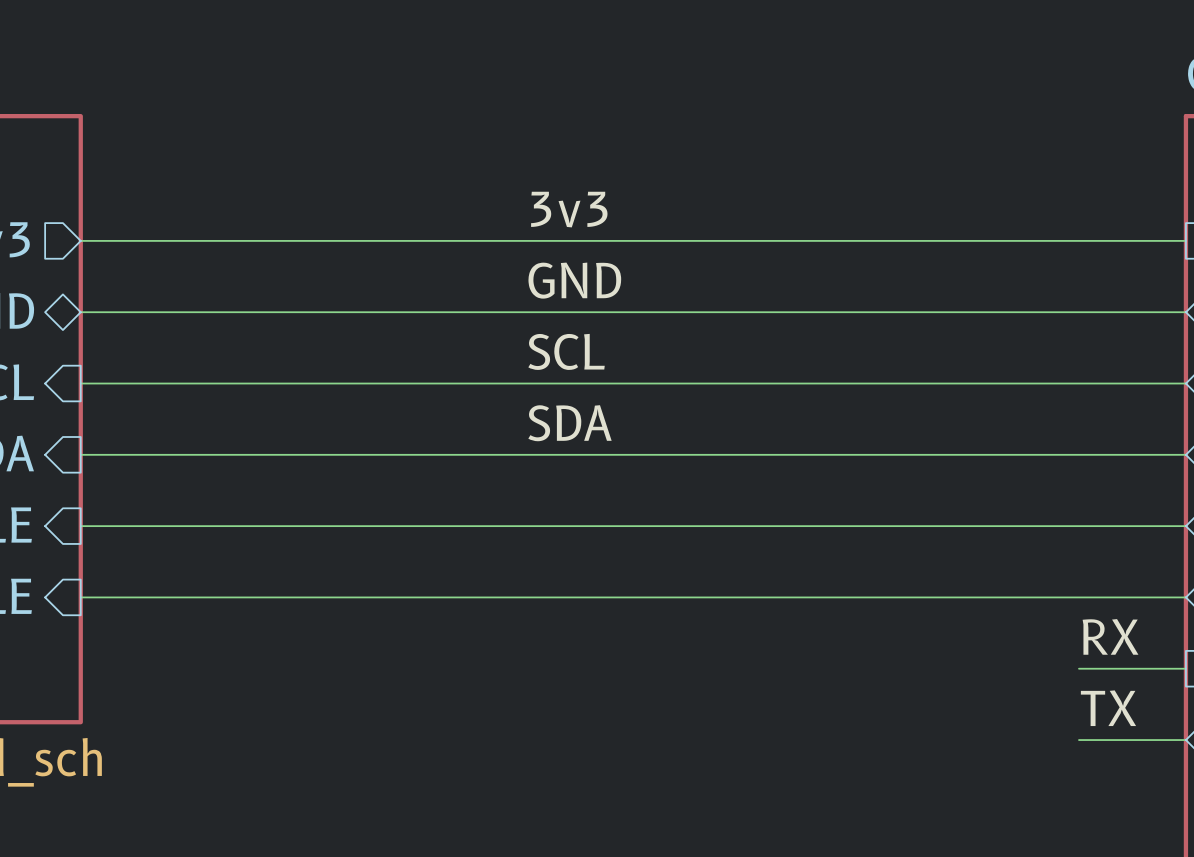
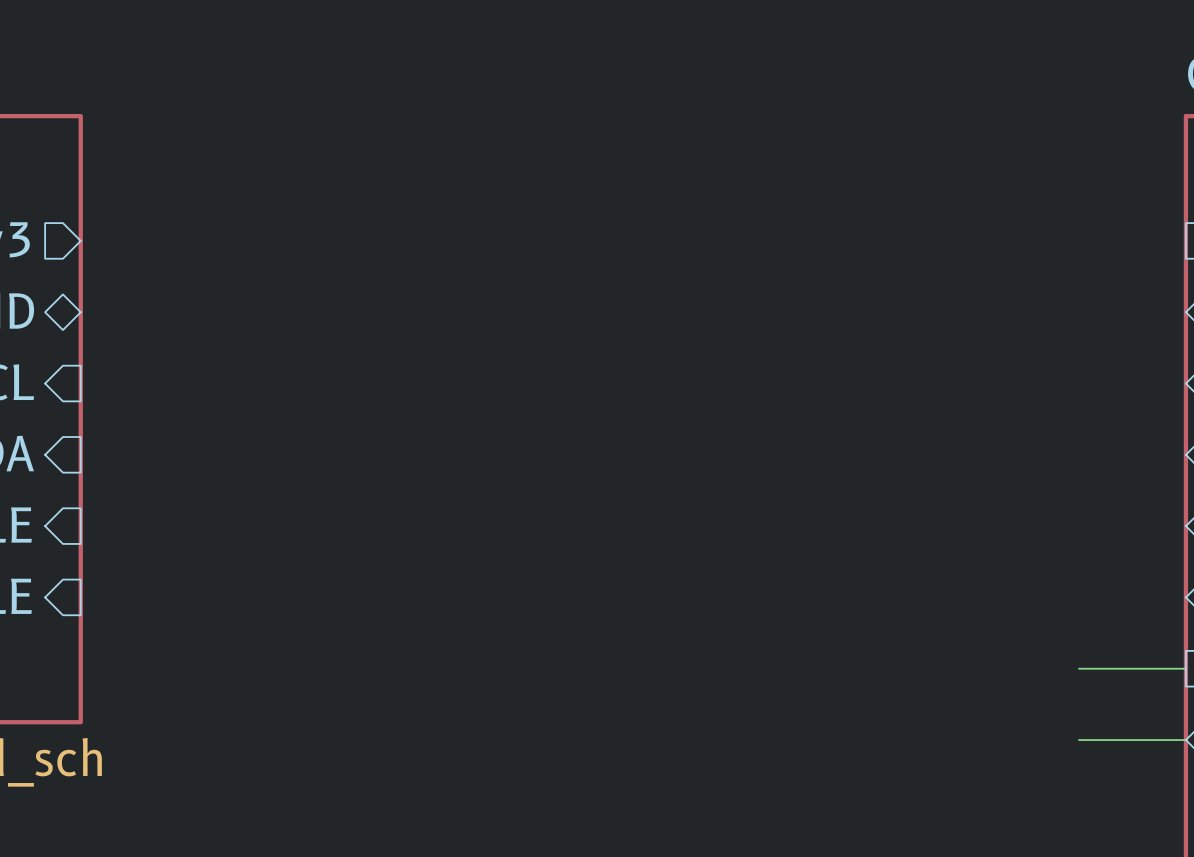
label: 3v3 (569, 209) -> none
wire: (80, 240) (1185, 240) -> none
label: GND (574, 280) -> none
wire: (80, 312) (1185, 312) -> none
label: SCL (566, 351) -> none
wire: (80, 383) (1185, 383) -> none
label: SDA (569, 423) -> none
wire: (80, 454) (1185, 454) -> none
wire: (80, 526) (1185, 526) -> none
wire: (80, 597) (1185, 597) -> none
label: RX (1110, 636) -> none
label: TX (1108, 708) -> none

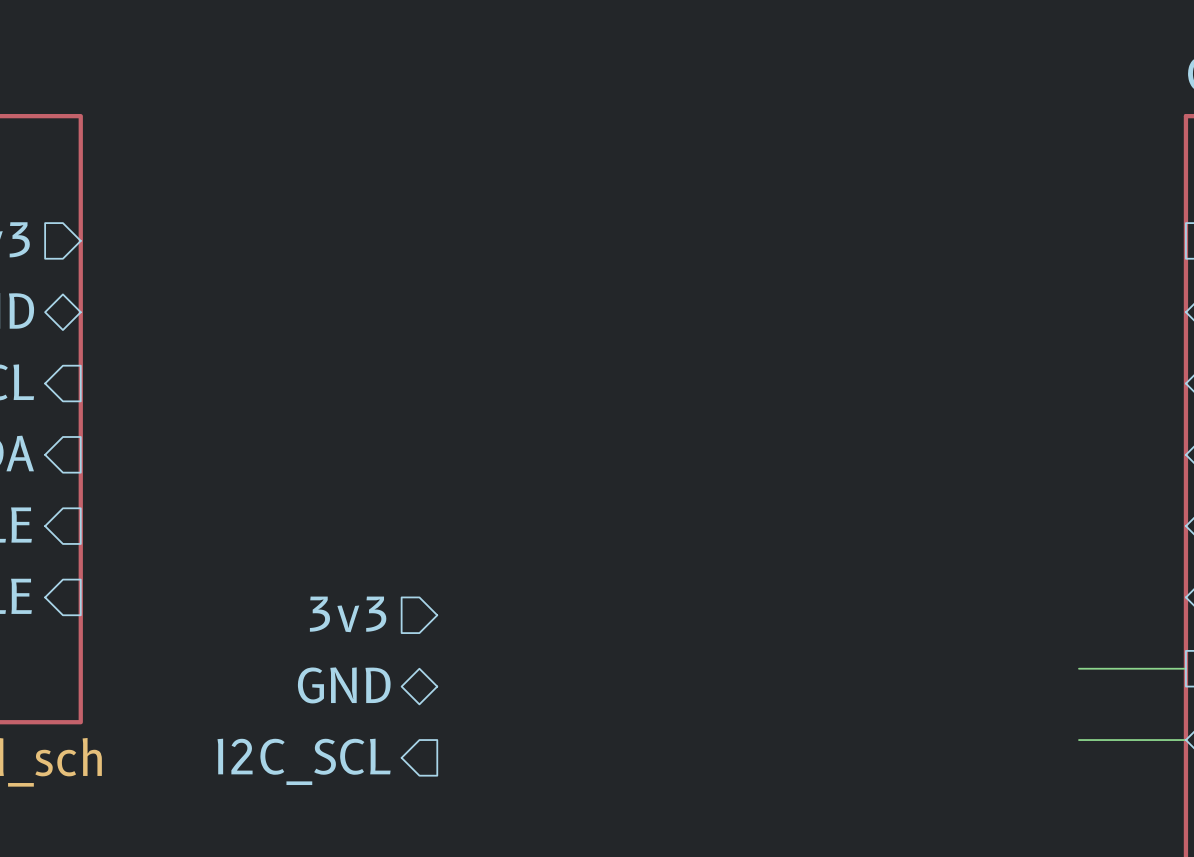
sheet pin: none -> 3v3 (348, 614)
sheet pin: none -> GND (344, 685)
sheet pin: none -> I2C_SCL (304, 761)

